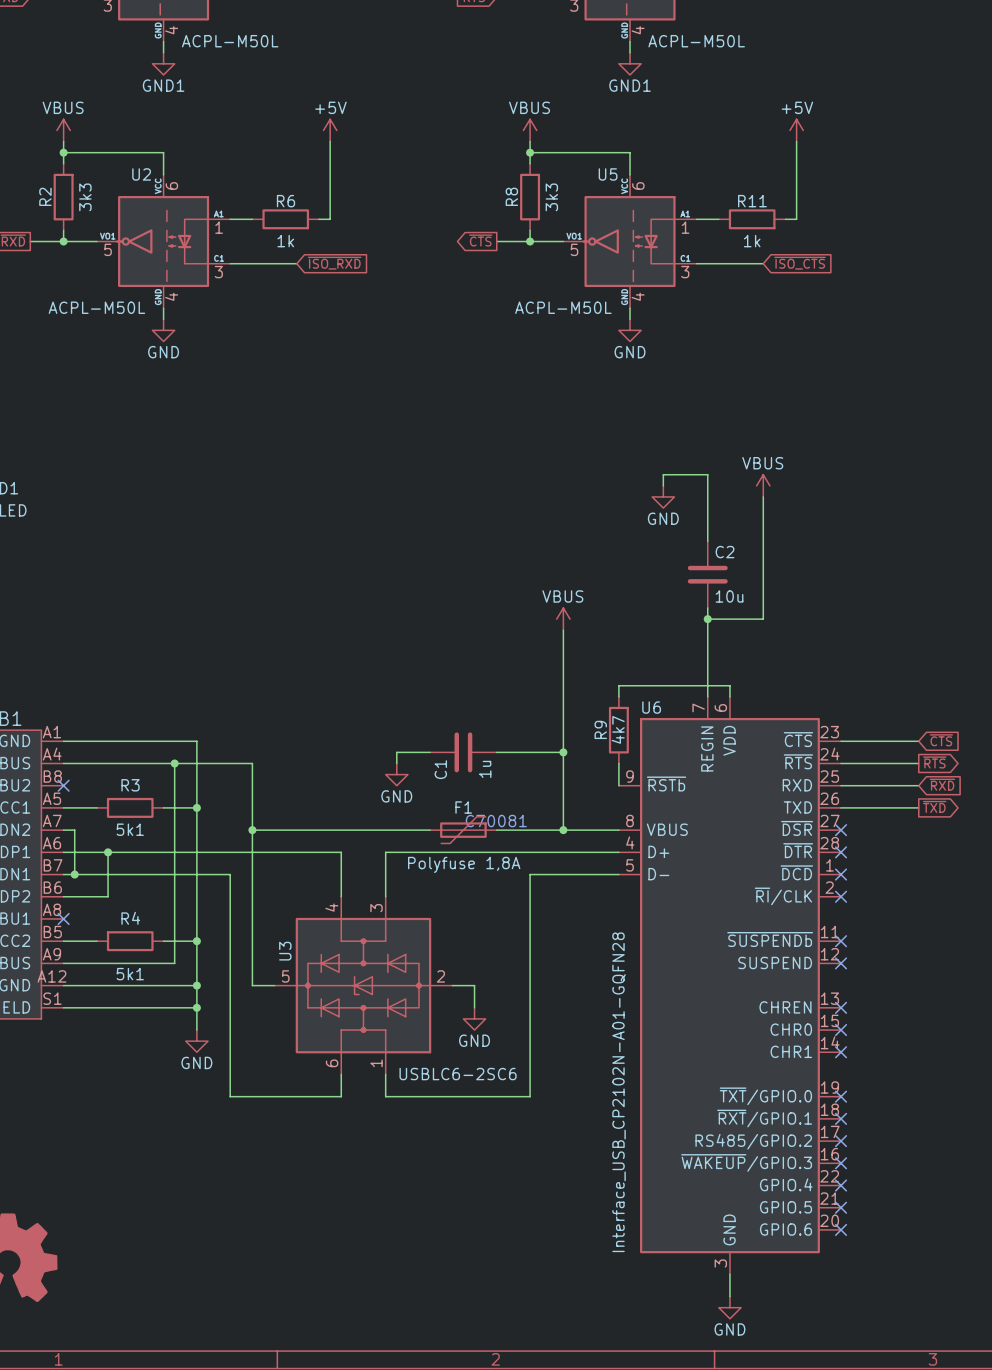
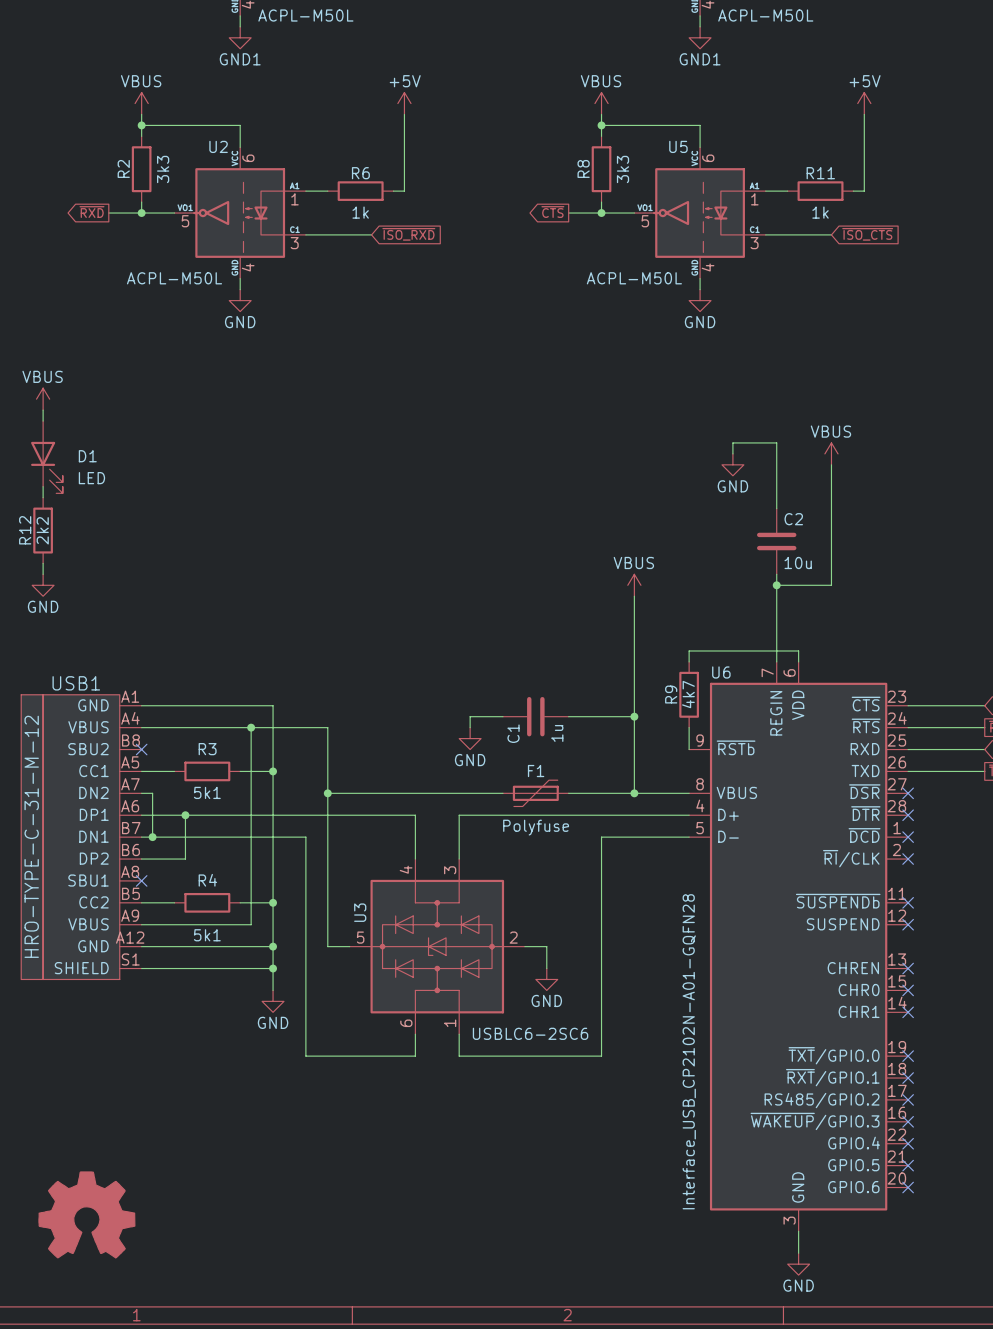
text: C70081 (496, 821) -> none
F1 value: Polyfuse 1,8A (464, 864) -> Polyfuse (536, 827)

